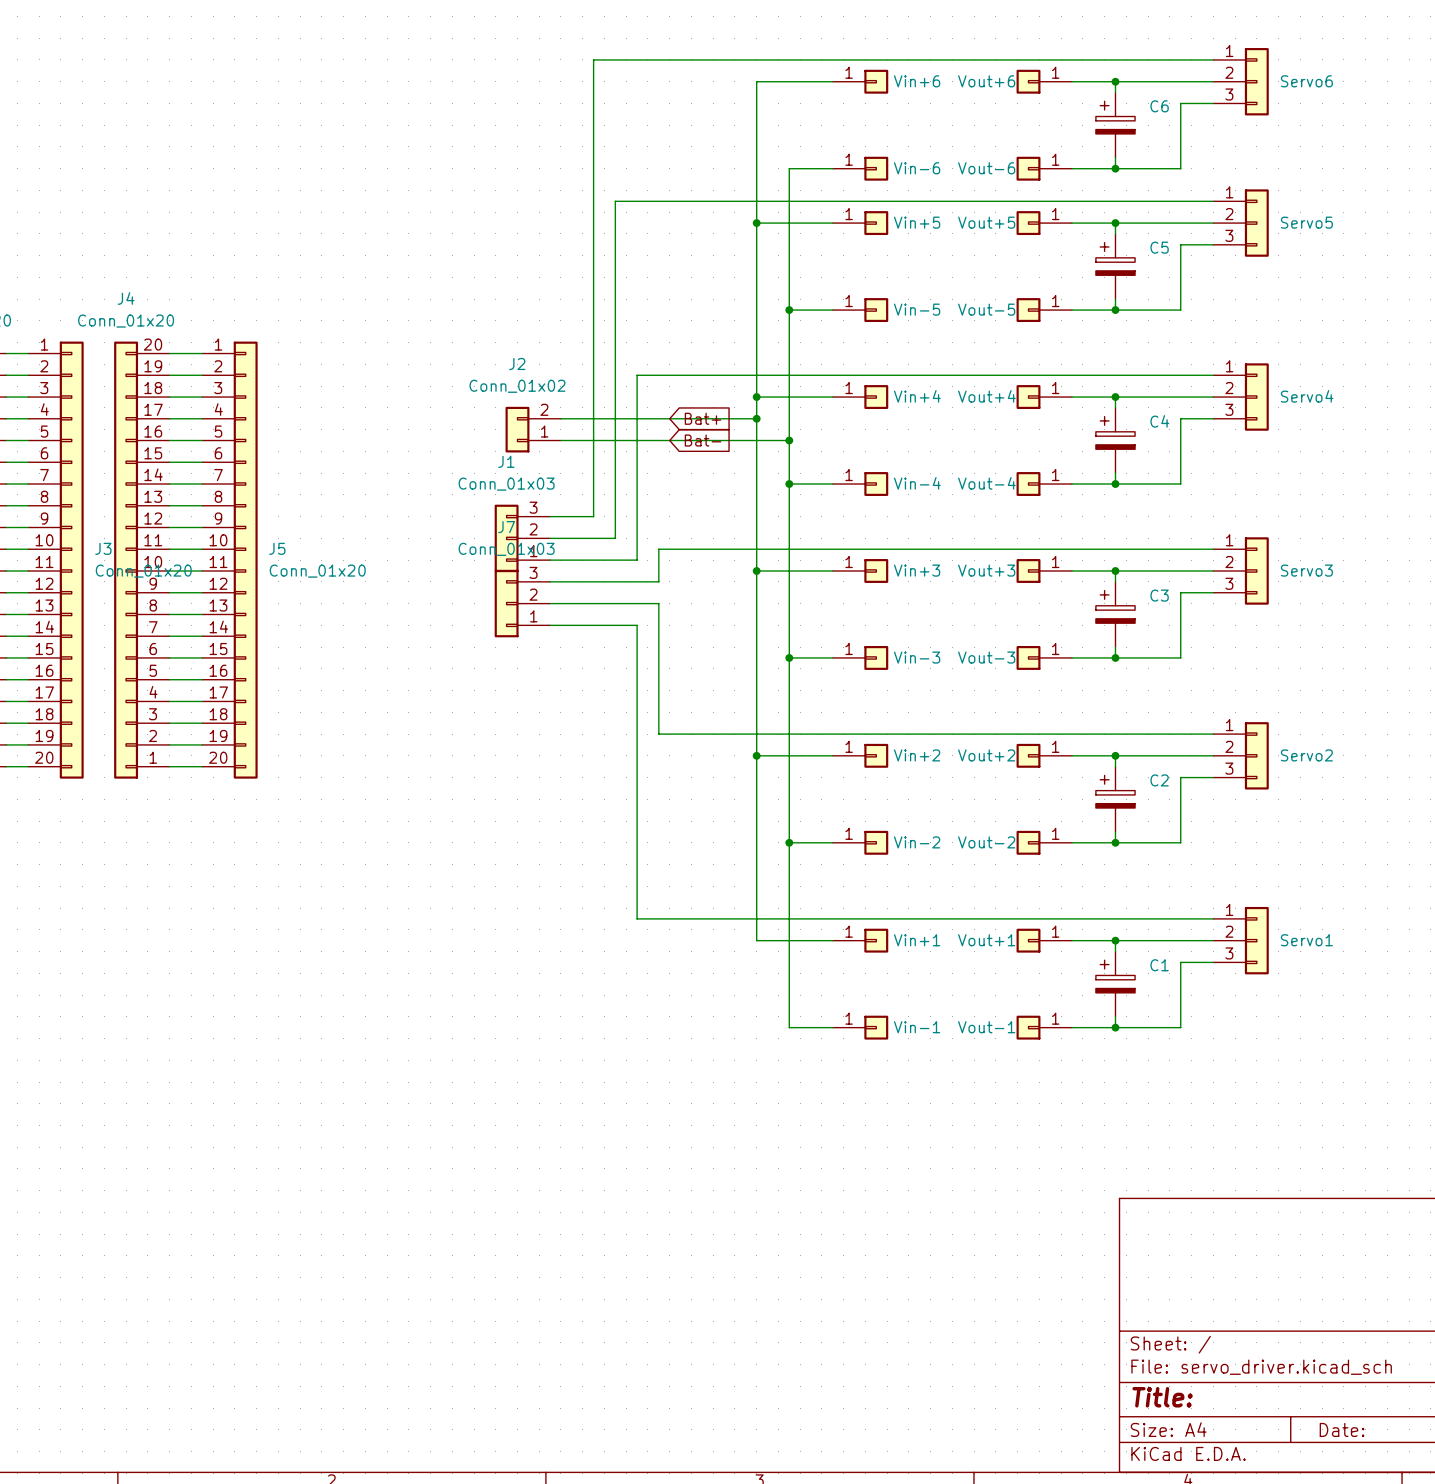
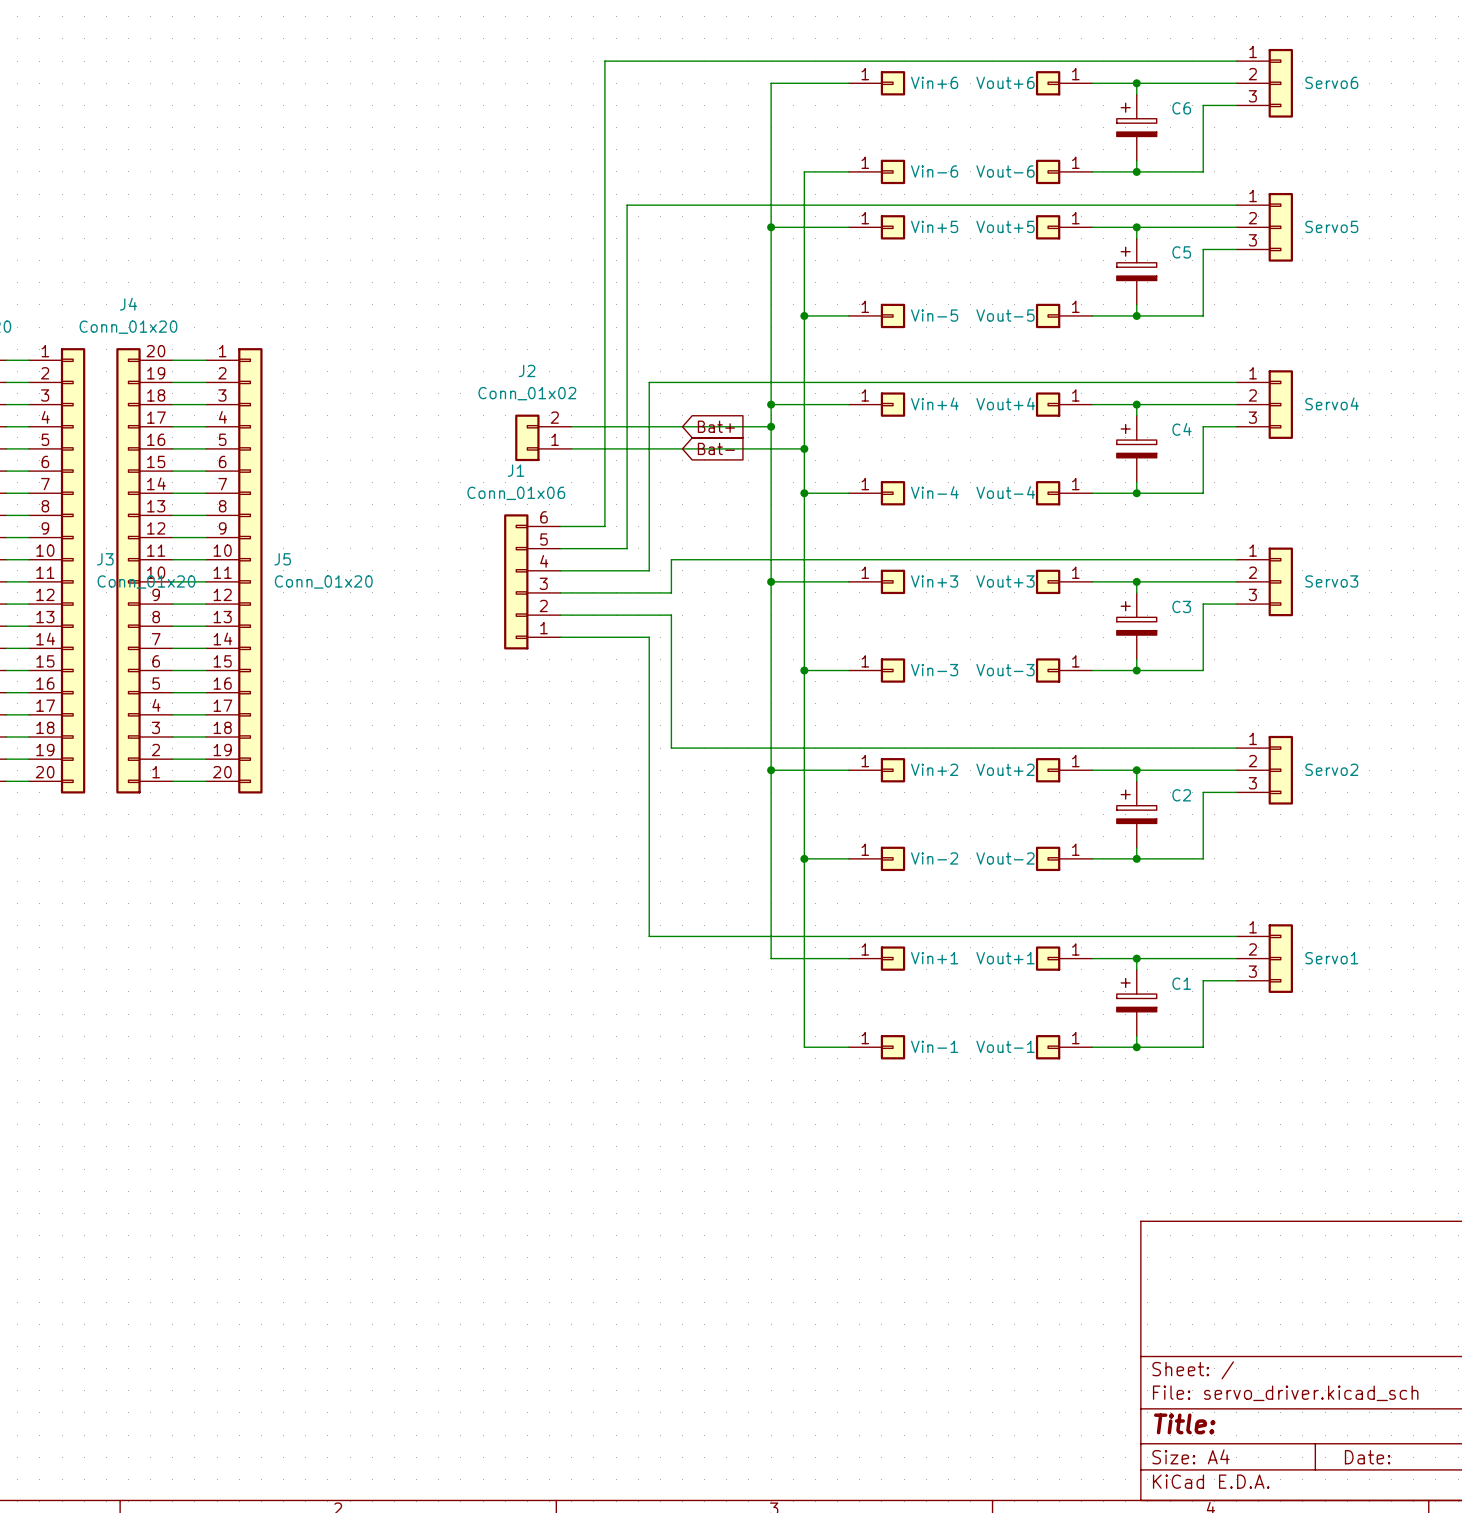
J1 value: Conn_01x03 (506, 484) -> Conn_01x06 (516, 493)
J1 symbol: [494, 504, 551, 573] -> [504, 514, 561, 650]
J7: Conn_01x03 (522, 603) -> none

